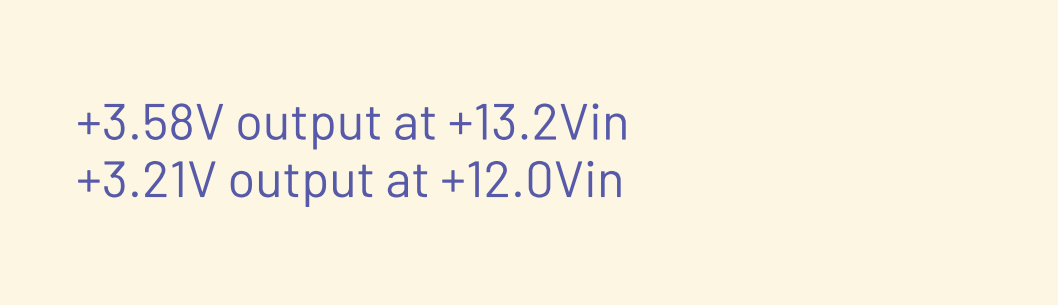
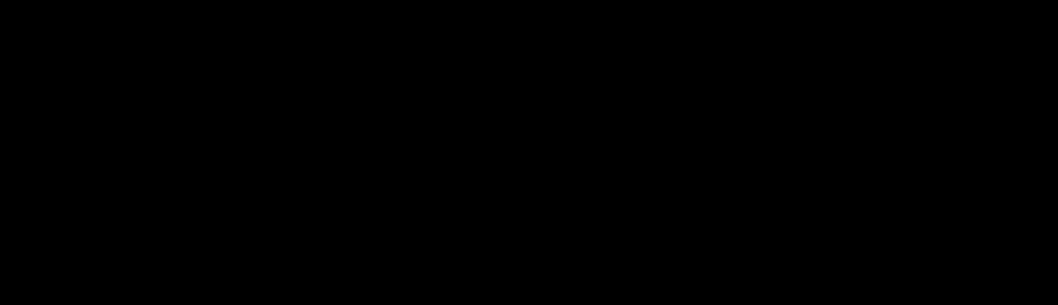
text: +3.58V output at +13.2Vin (351, 126) -> none
text: +3.21V output at +12.0Vin (349, 183) -> none

